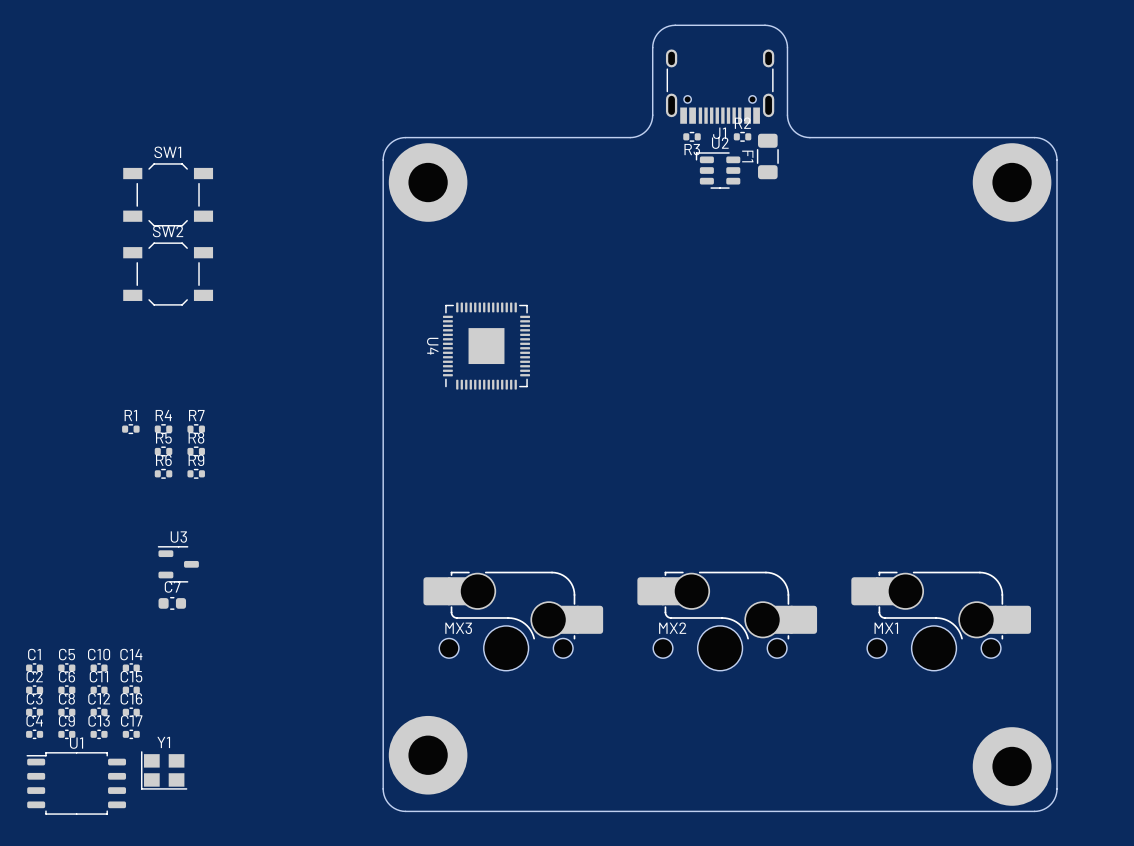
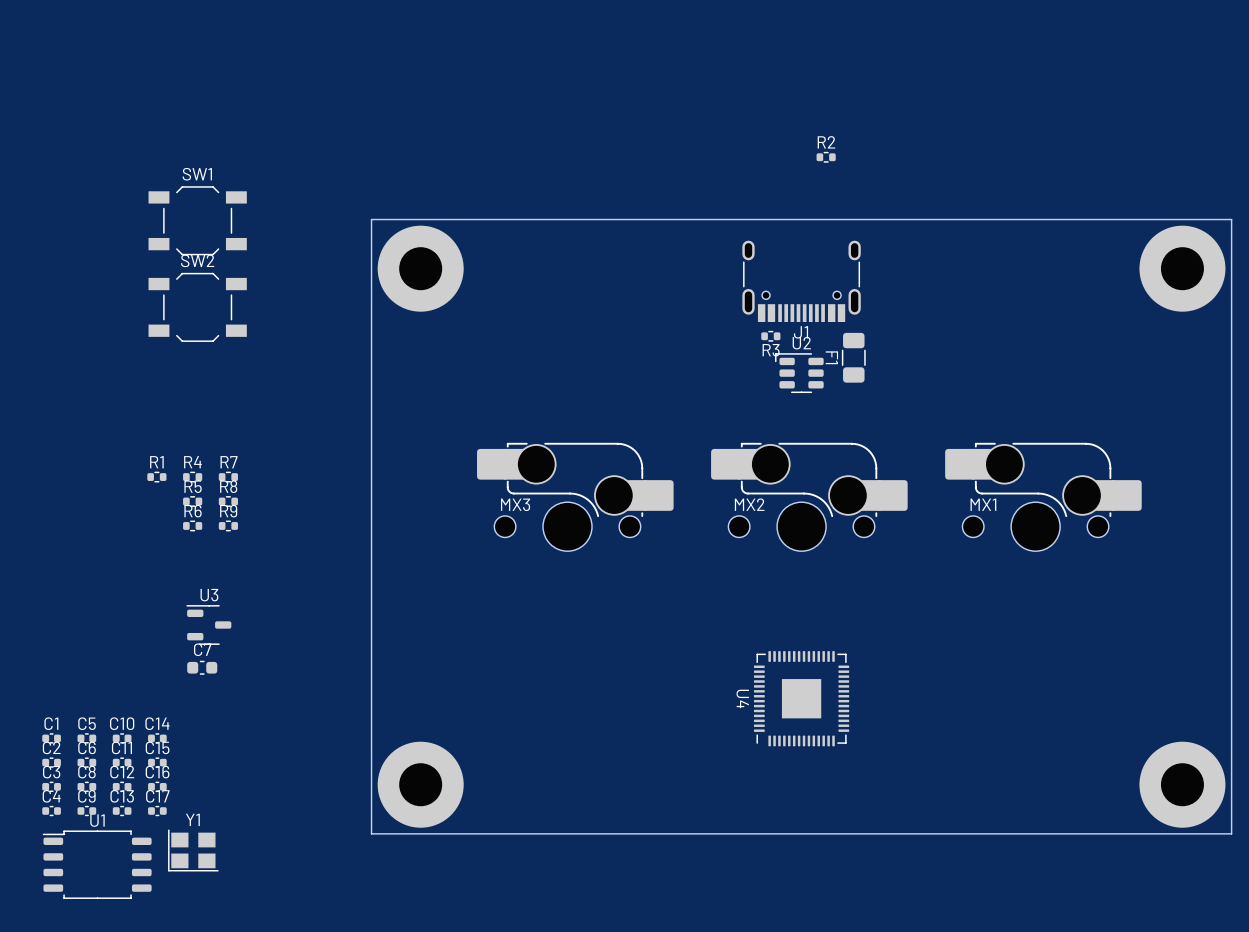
board edge: (765, 25) (675, 25) (661, 29) (655, 36) (652, 44) (652, 120) (646, 131) (637, 136) (405, 137) (393, 141) (385, 150) (383, 160) (383, 788) (387, 802) (397, 809) (405, 811) (1034, 811) (1046, 807) (1054, 798) (1056, 788) (1055, 152) (1048, 142) (1037, 137) (809, 137) (801, 135) (792, 128) (787, 118) (786, 40) (776, 28) (765, 25) -> (1231, 219) (1231, 833) (371, 833) (371, 219) (1231, 219)
J1 position: (720, 86) -> (801, 281)
R3 position: (692, 136) -> (770, 336)
F1 position: (767, 156) -> (853, 357)
U2 position: (718, 170) -> (799, 373)
part position: (428, 182) -> (420, 268)
part position: (1012, 182) -> (1182, 268)
U4 position: (486, 346) -> (801, 698)
MX3 position: (513, 621) -> (575, 497)
MX2 position: (727, 621) -> (809, 497)
MX1 position: (941, 621) -> (1043, 497)
part position: (428, 755) -> (420, 784)
part position: (1012, 766) -> (1182, 784)

